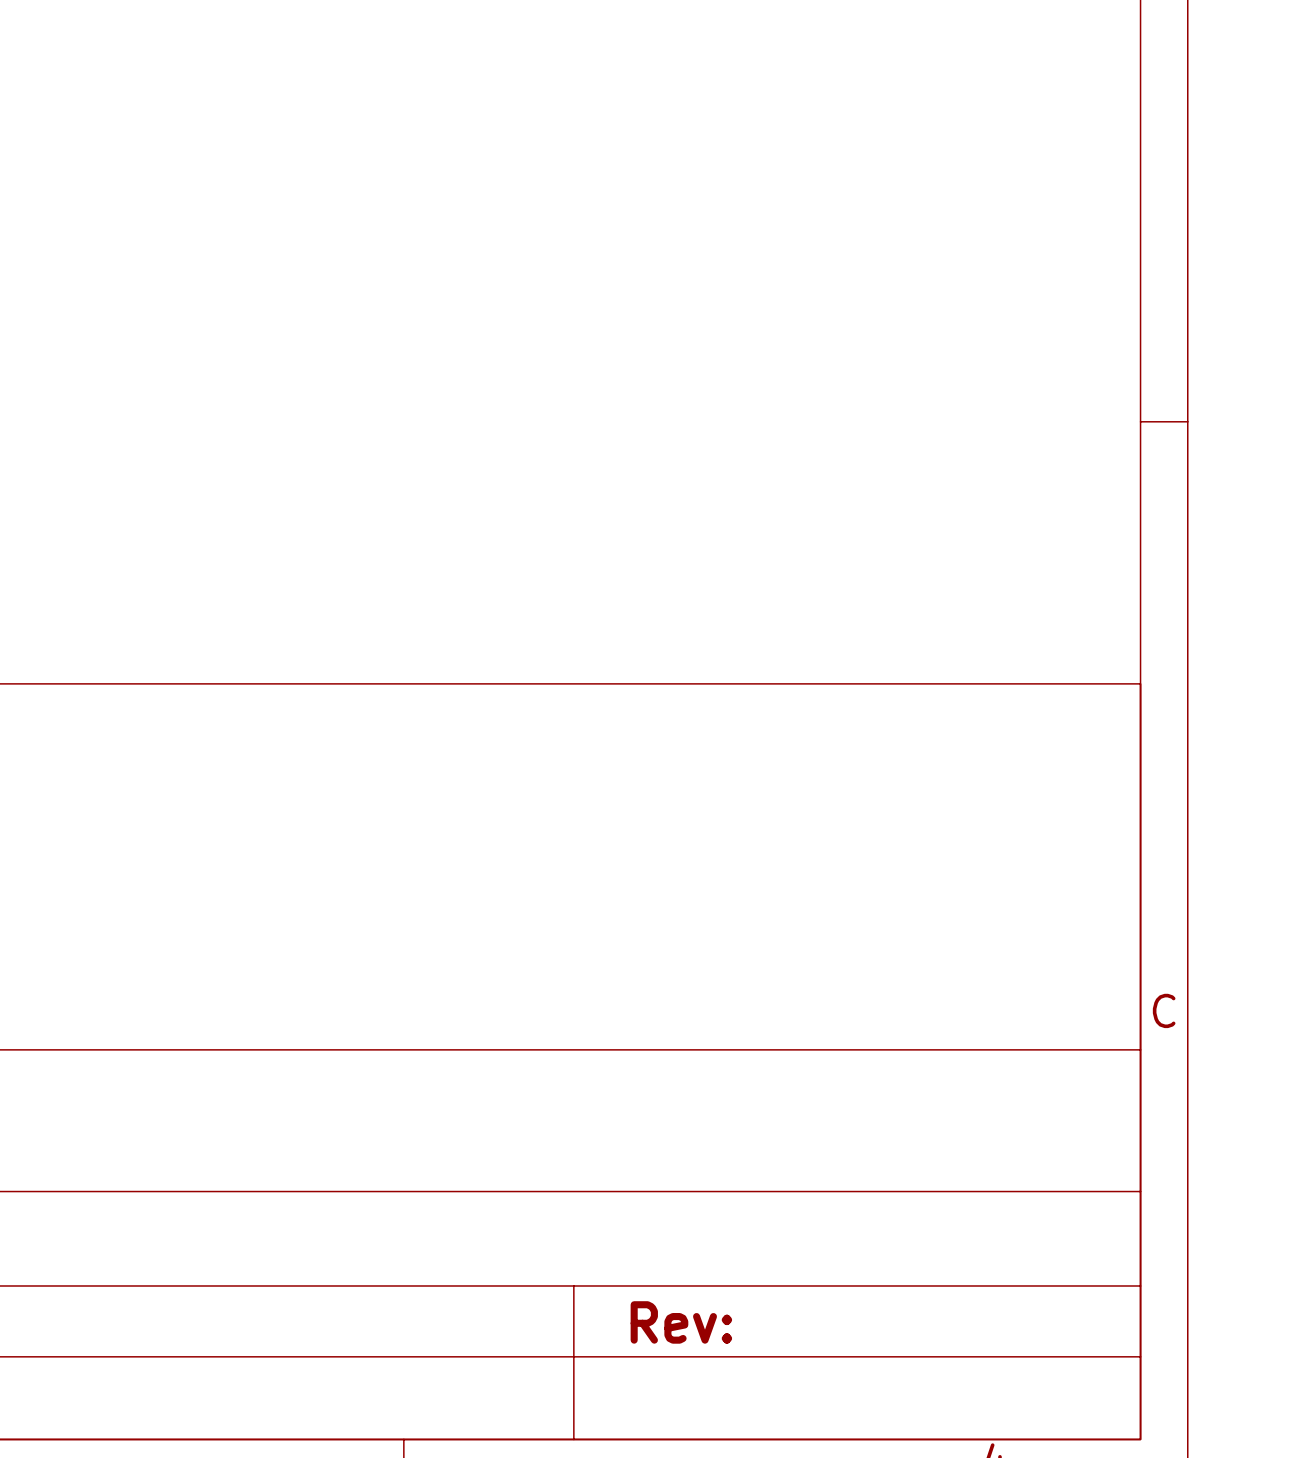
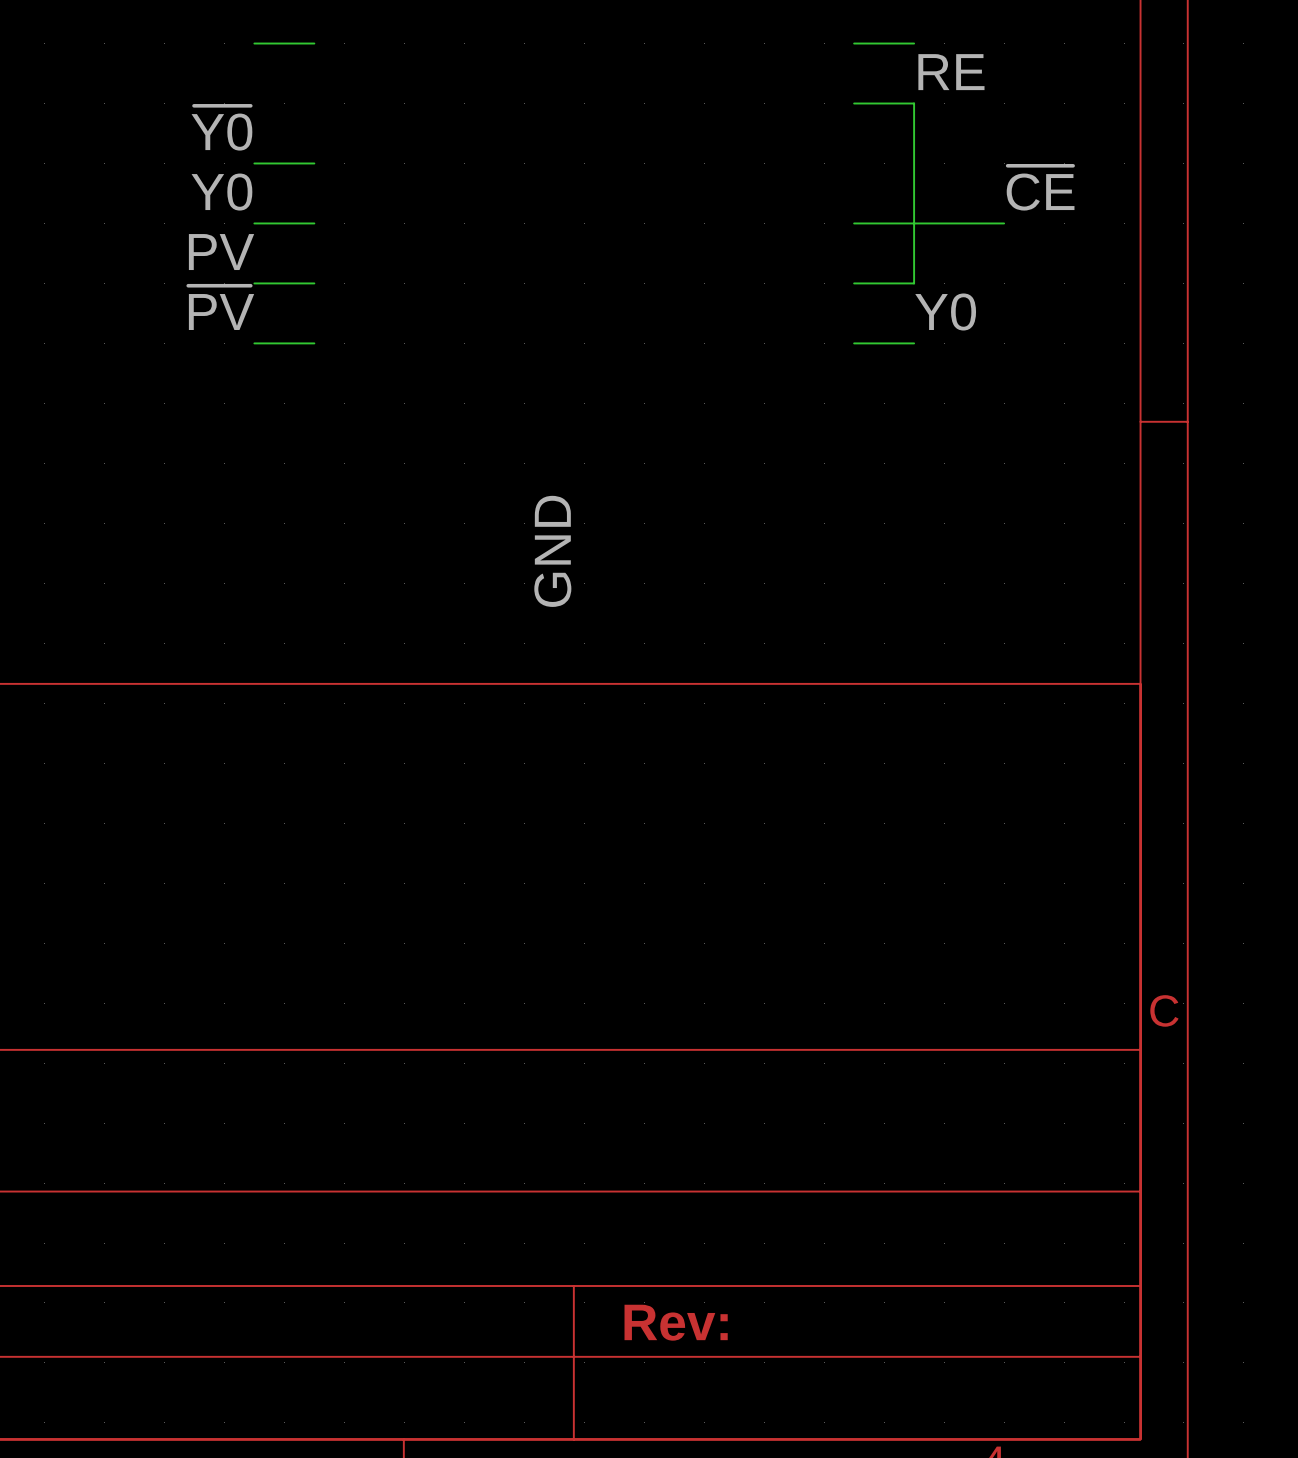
wire: none -> (254, 43) (314, 43)
wire: none -> (854, 43) (914, 43)
label: none -> RE (951, 72)
wire: none -> (854, 103) (914, 103) (914, 283) (854, 283)
label: none -> ~{Y0} (221, 128)
wire: none -> (254, 163) (314, 163)
label: none -> ~{CE} (1040, 188)
label: none -> Y0 (221, 192)
wire: none -> (254, 223) (314, 223)
wire: none -> (854, 223) (1004, 223)
label: none -> PV (221, 252)
wire: none -> (254, 283) (314, 283)
label: none -> ~{PV} (221, 307)
label: none -> Y0 (945, 312)
wire: none -> (254, 343) (314, 343)
wire: none -> (854, 343) (914, 343)
label: none -> GND (552, 551)

